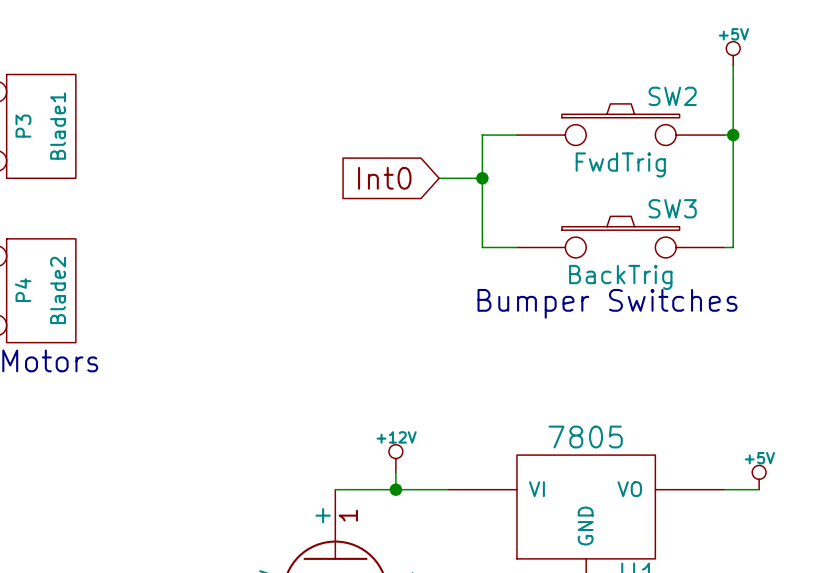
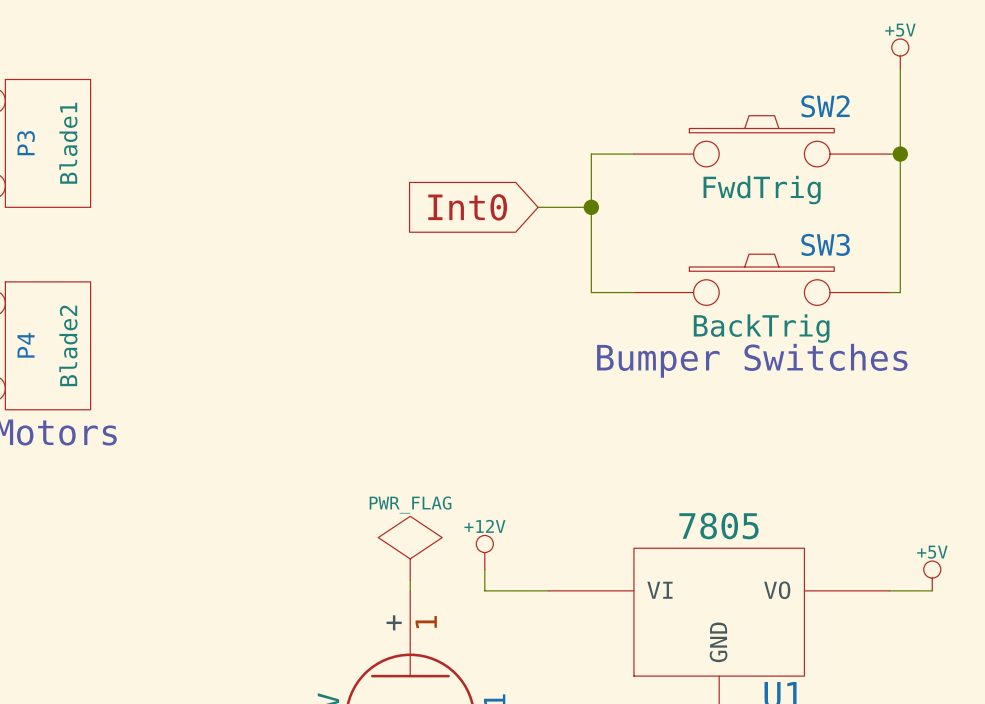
power symbol: none -> PWR_FLAG (410, 548)
wire: (335, 489) (395, 489) -> (410, 590) (410, 580)
junction: (395, 489) -> none

